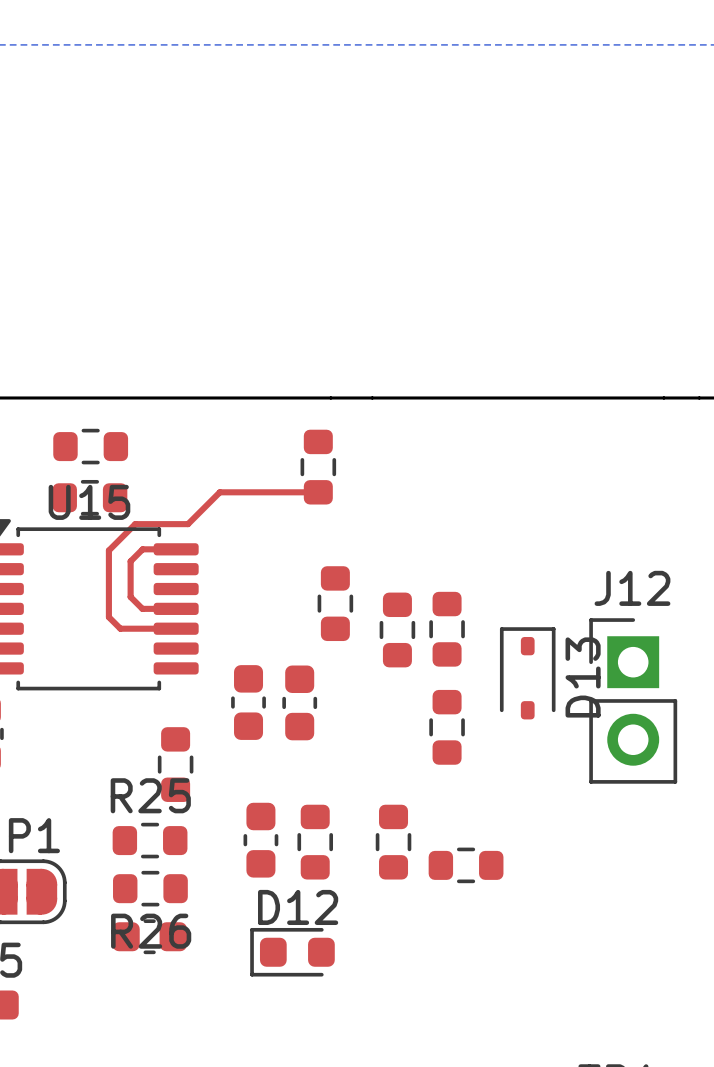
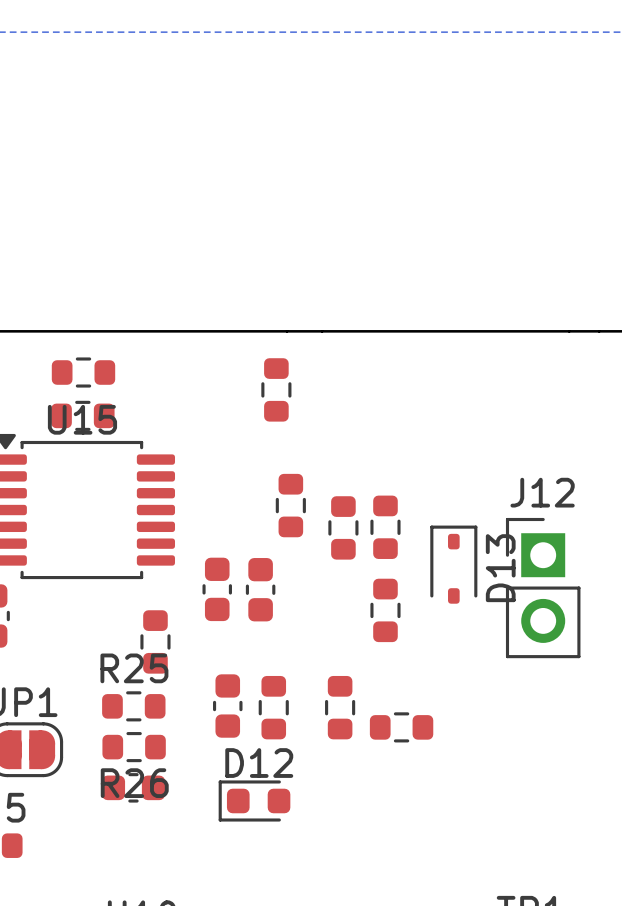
top track: (318, 492) (219, 492) (188, 524) (135, 524) (108, 550) (108, 617) (120, 628) (176, 628) -> none
top track: (176, 549) (142, 549) (130, 561) (130, 597) (142, 608) (176, 608) -> none

